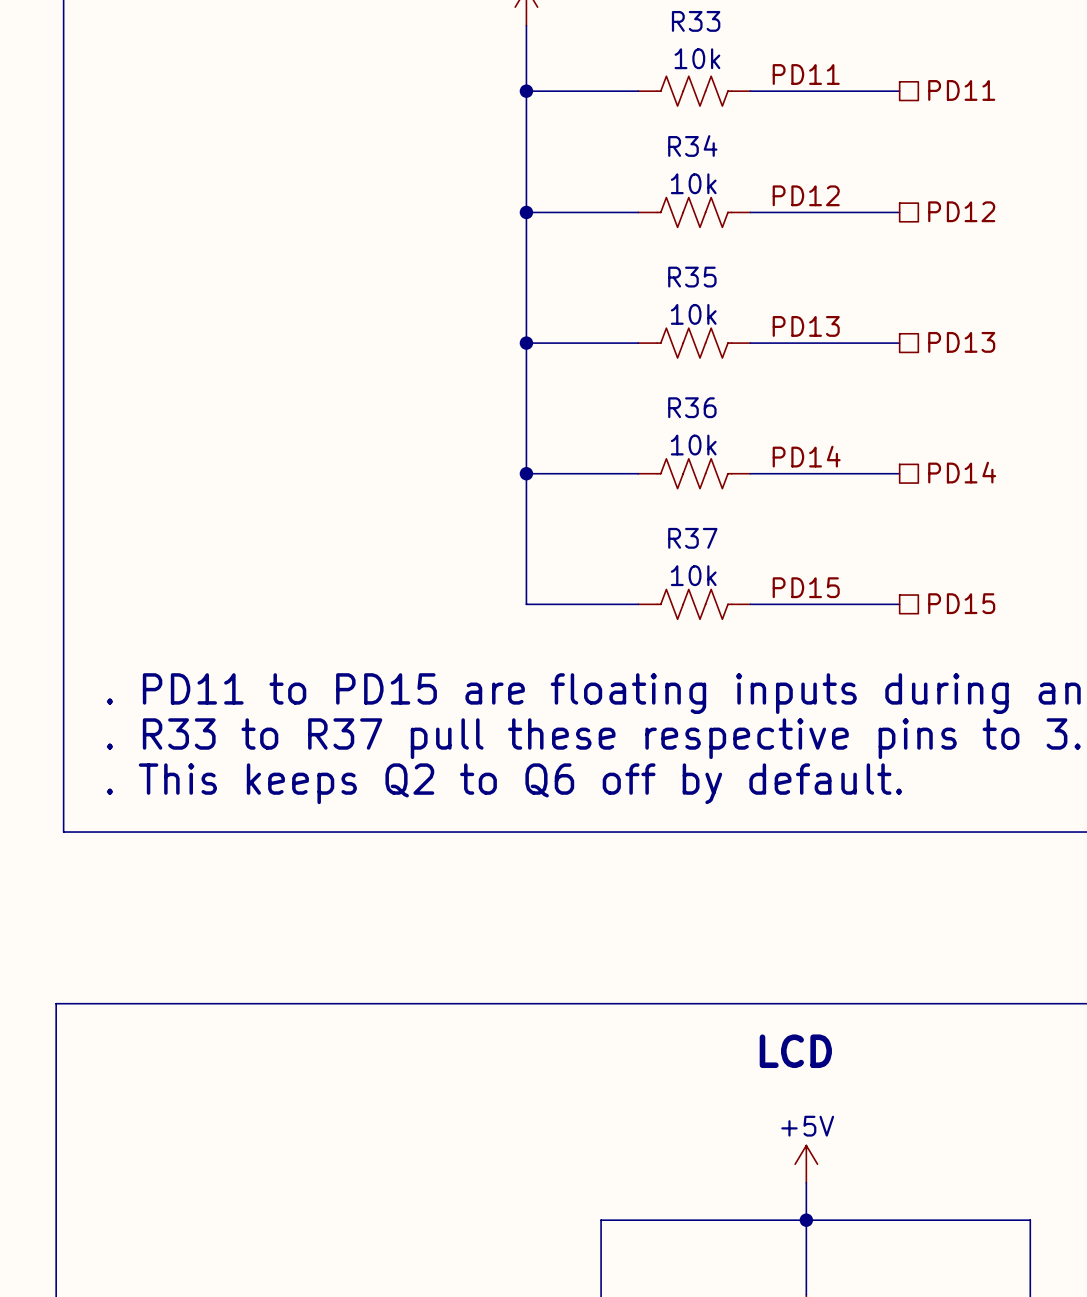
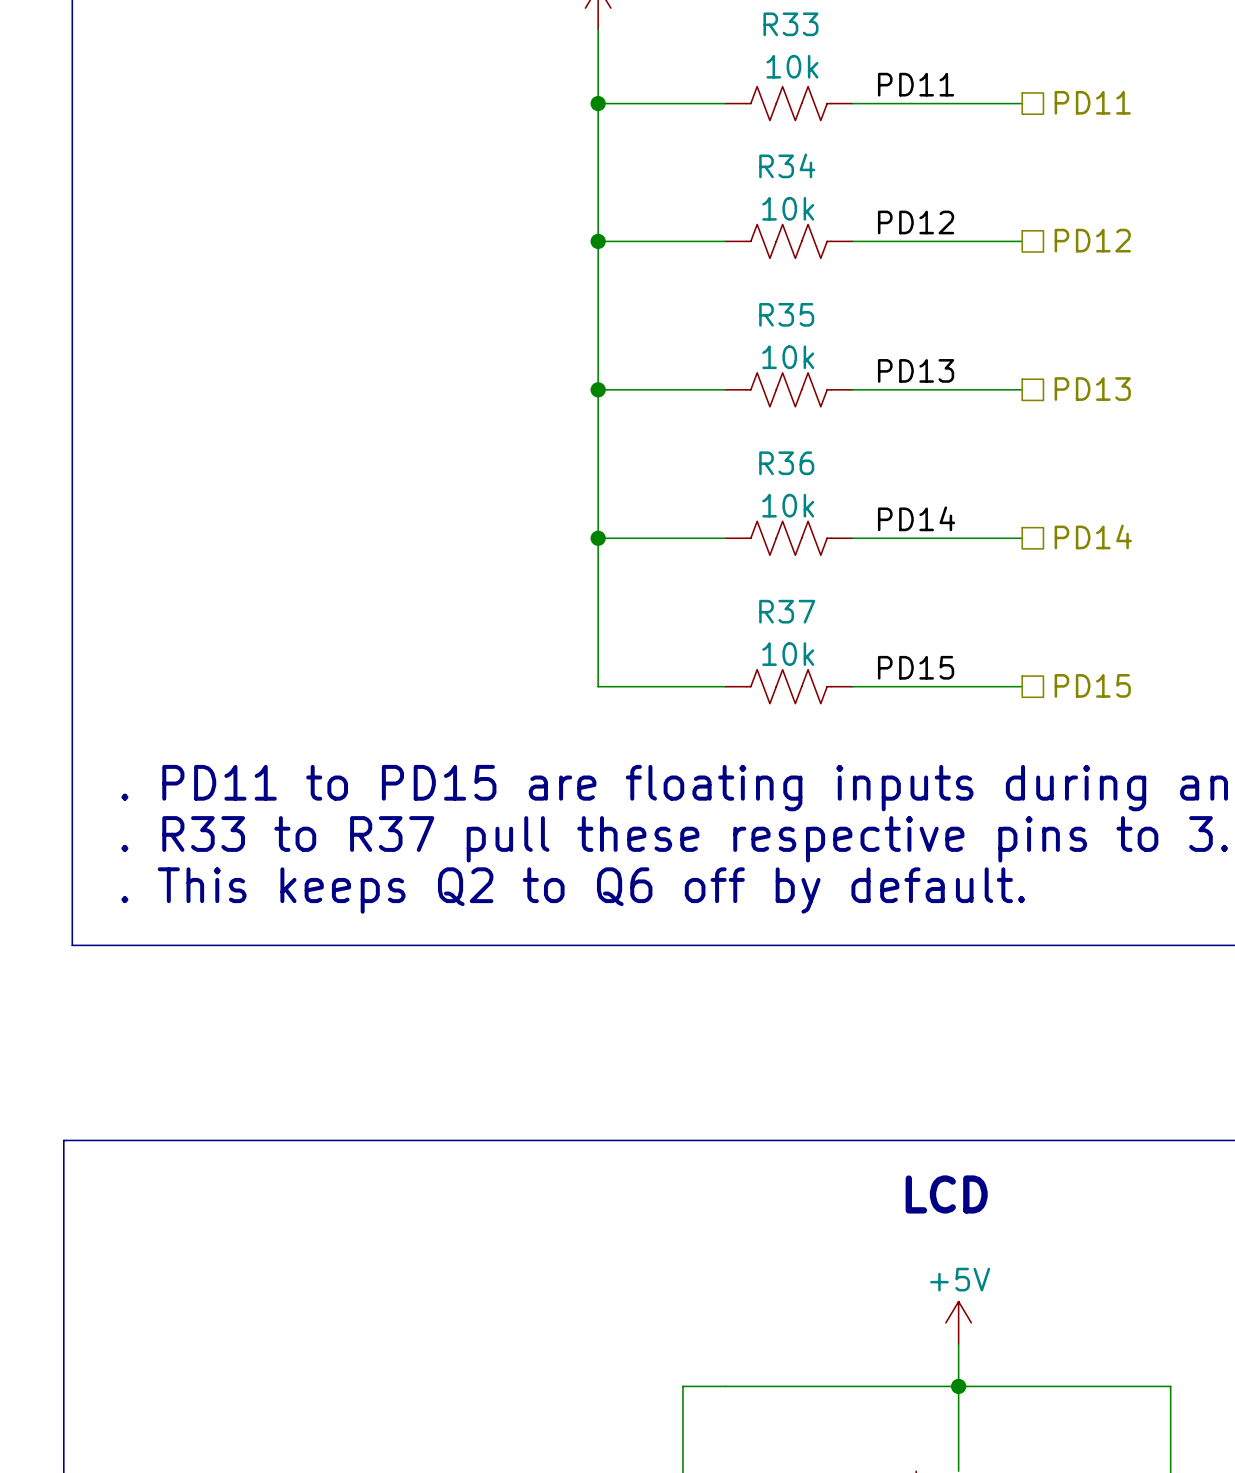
text position: LCD (795, 1051) -> LCD (946, 1194)
power symbol position: +5V (806, 1164) -> +5V (958, 1322)
wire: (806, 1182) (806, 1294) -> (958, 1344) (958, 1471)
junction position: (806, 1220) -> (958, 1386)

